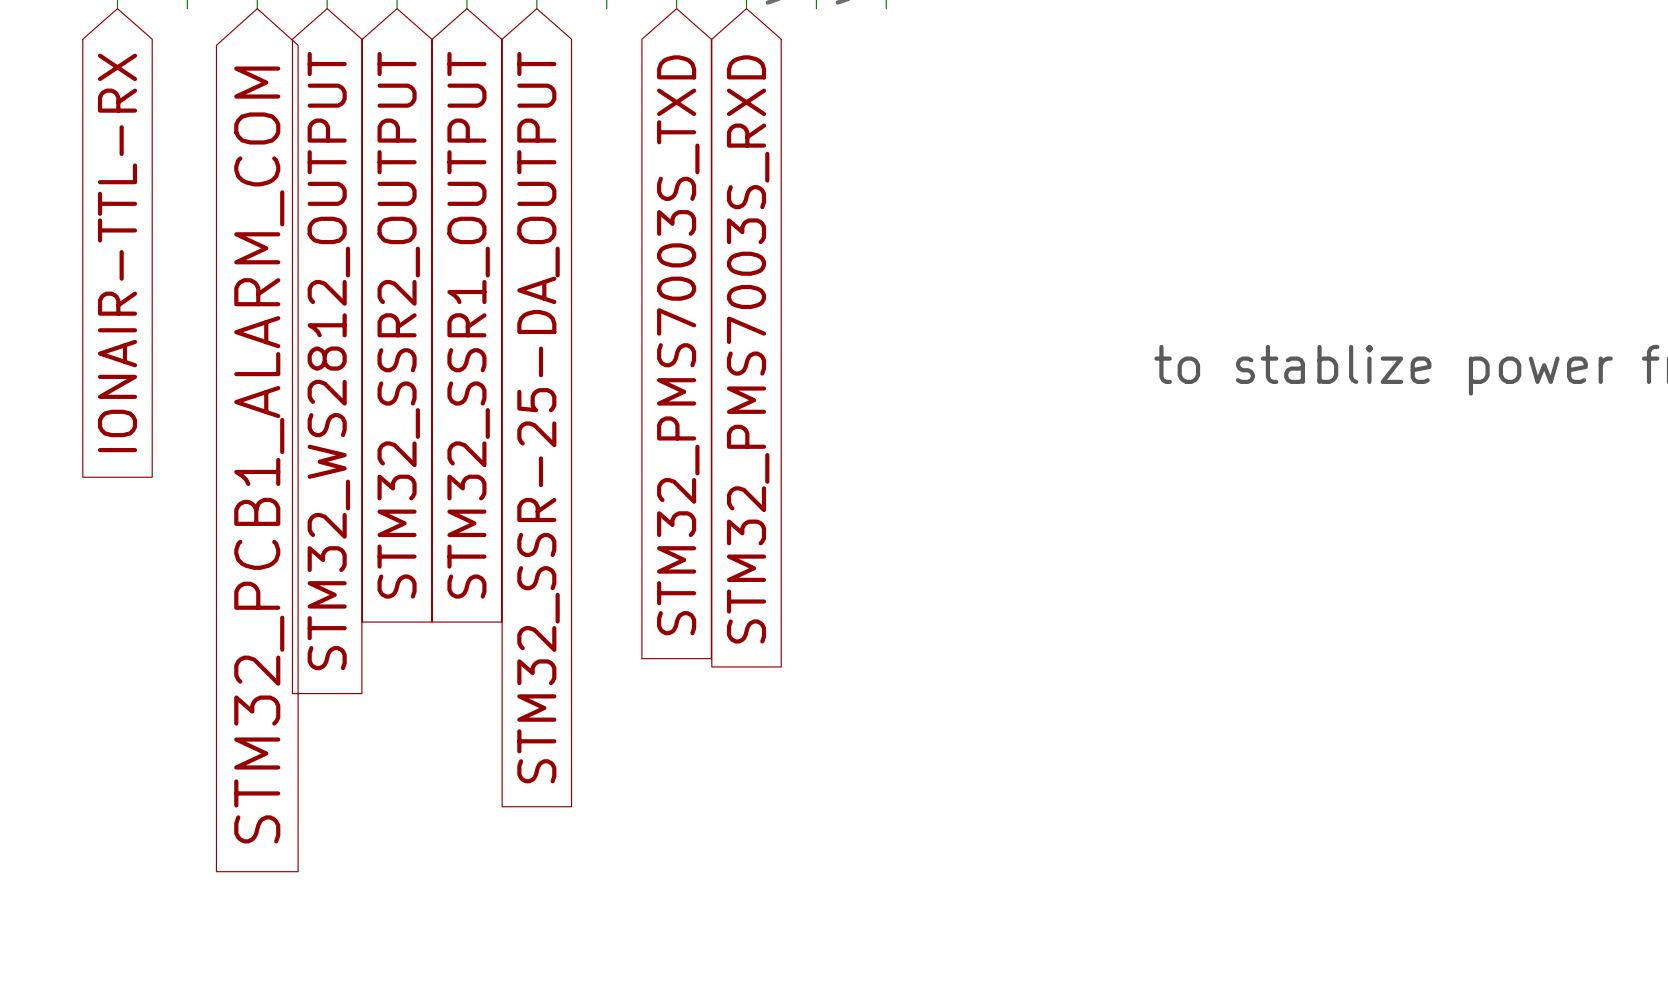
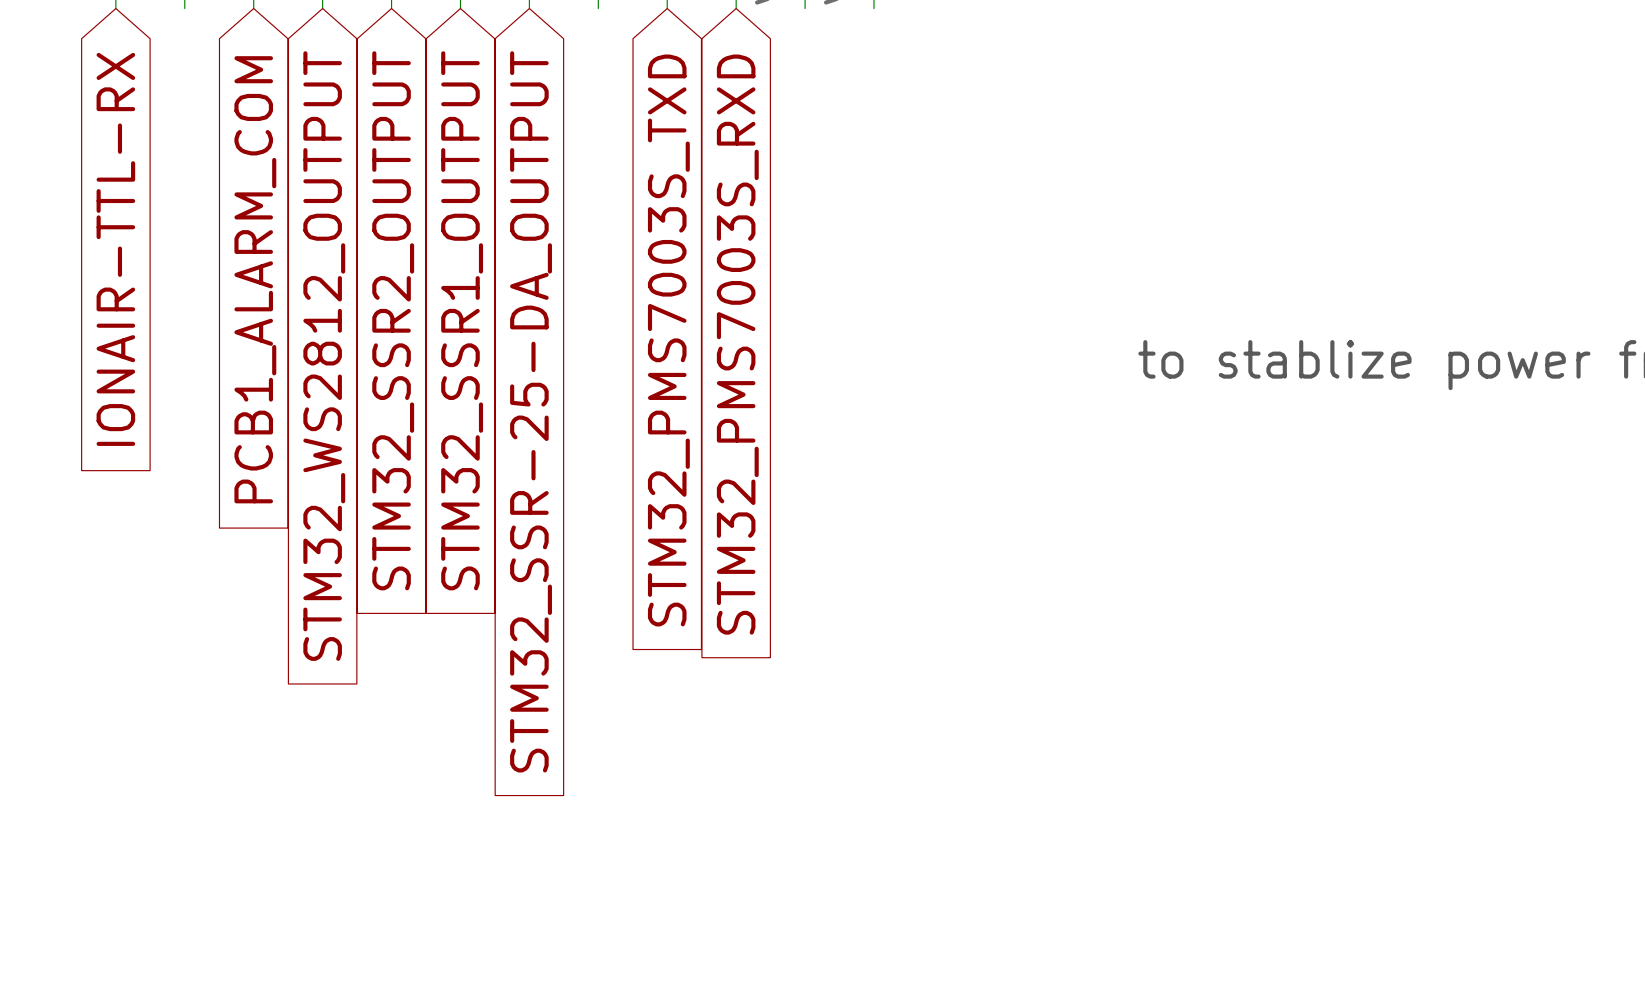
global label: STM32_PCB1_ALARM_COM (259, 454) -> PCB1_ALARM_COM (255, 279)

